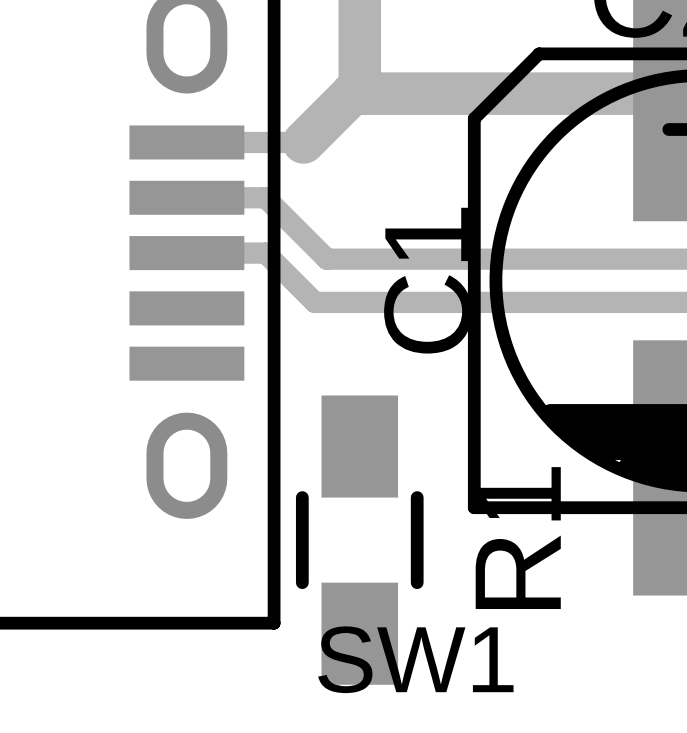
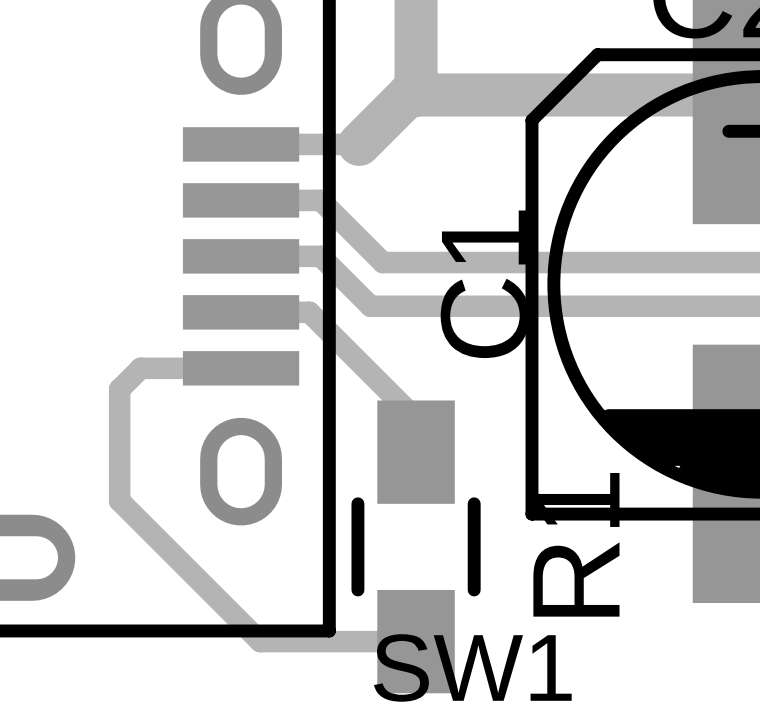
track: none -> (241, 312) (309, 312) (416, 418) (416, 452)
track: none -> (241, 368) (140, 368) (119, 389) (119, 500) (260, 641) (416, 641)

